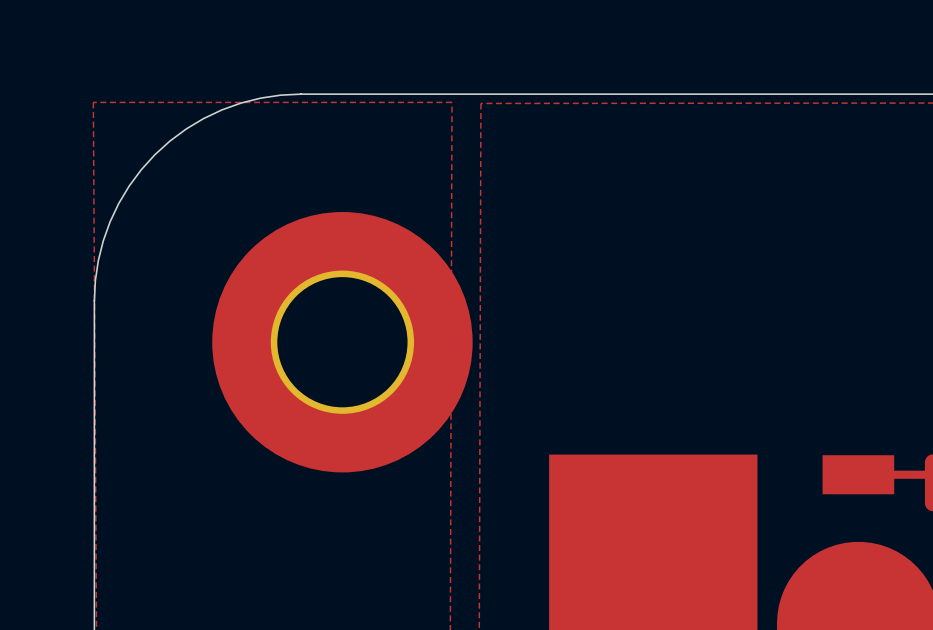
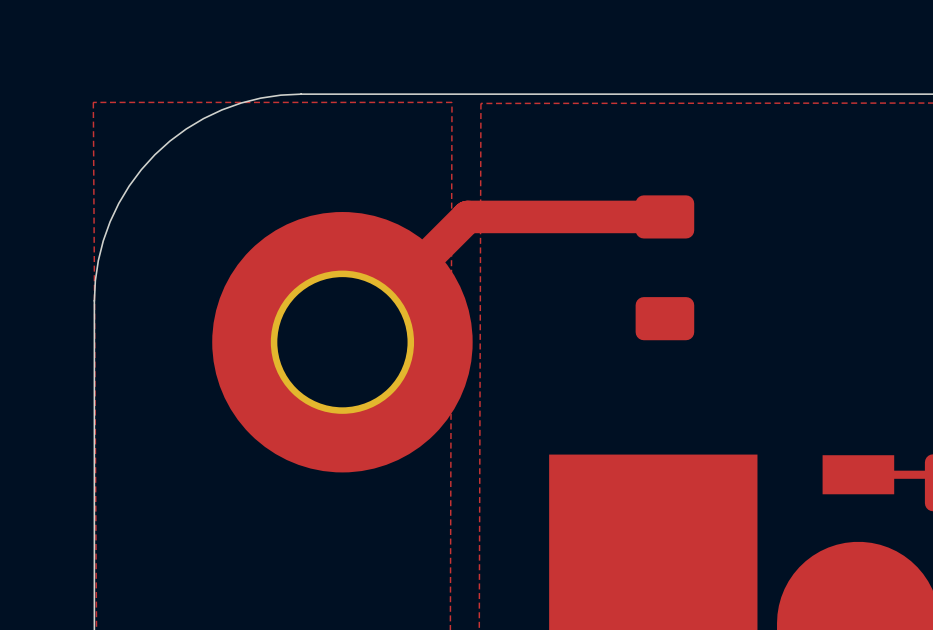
top track: none -> (664, 216) (467, 216) (342, 342)
part: none -> (664, 267)

